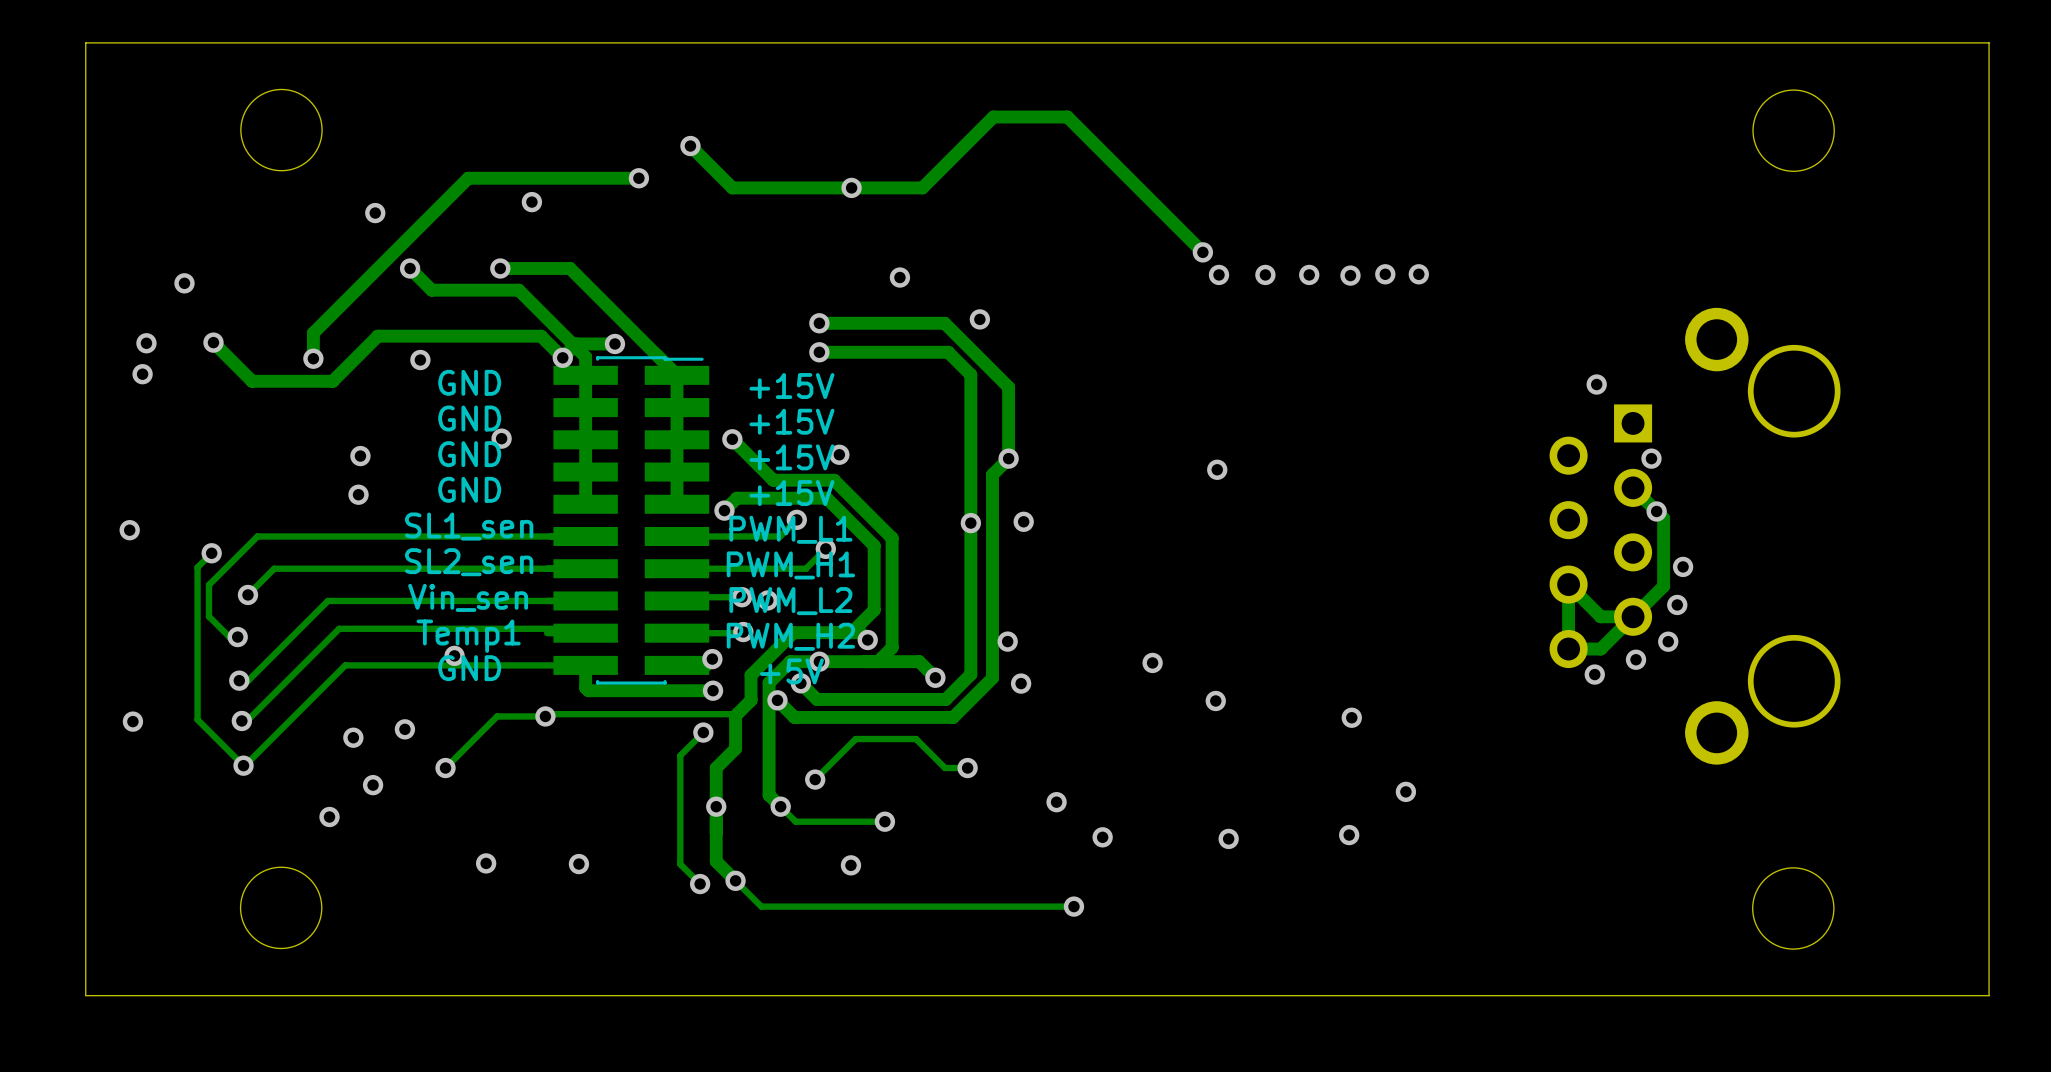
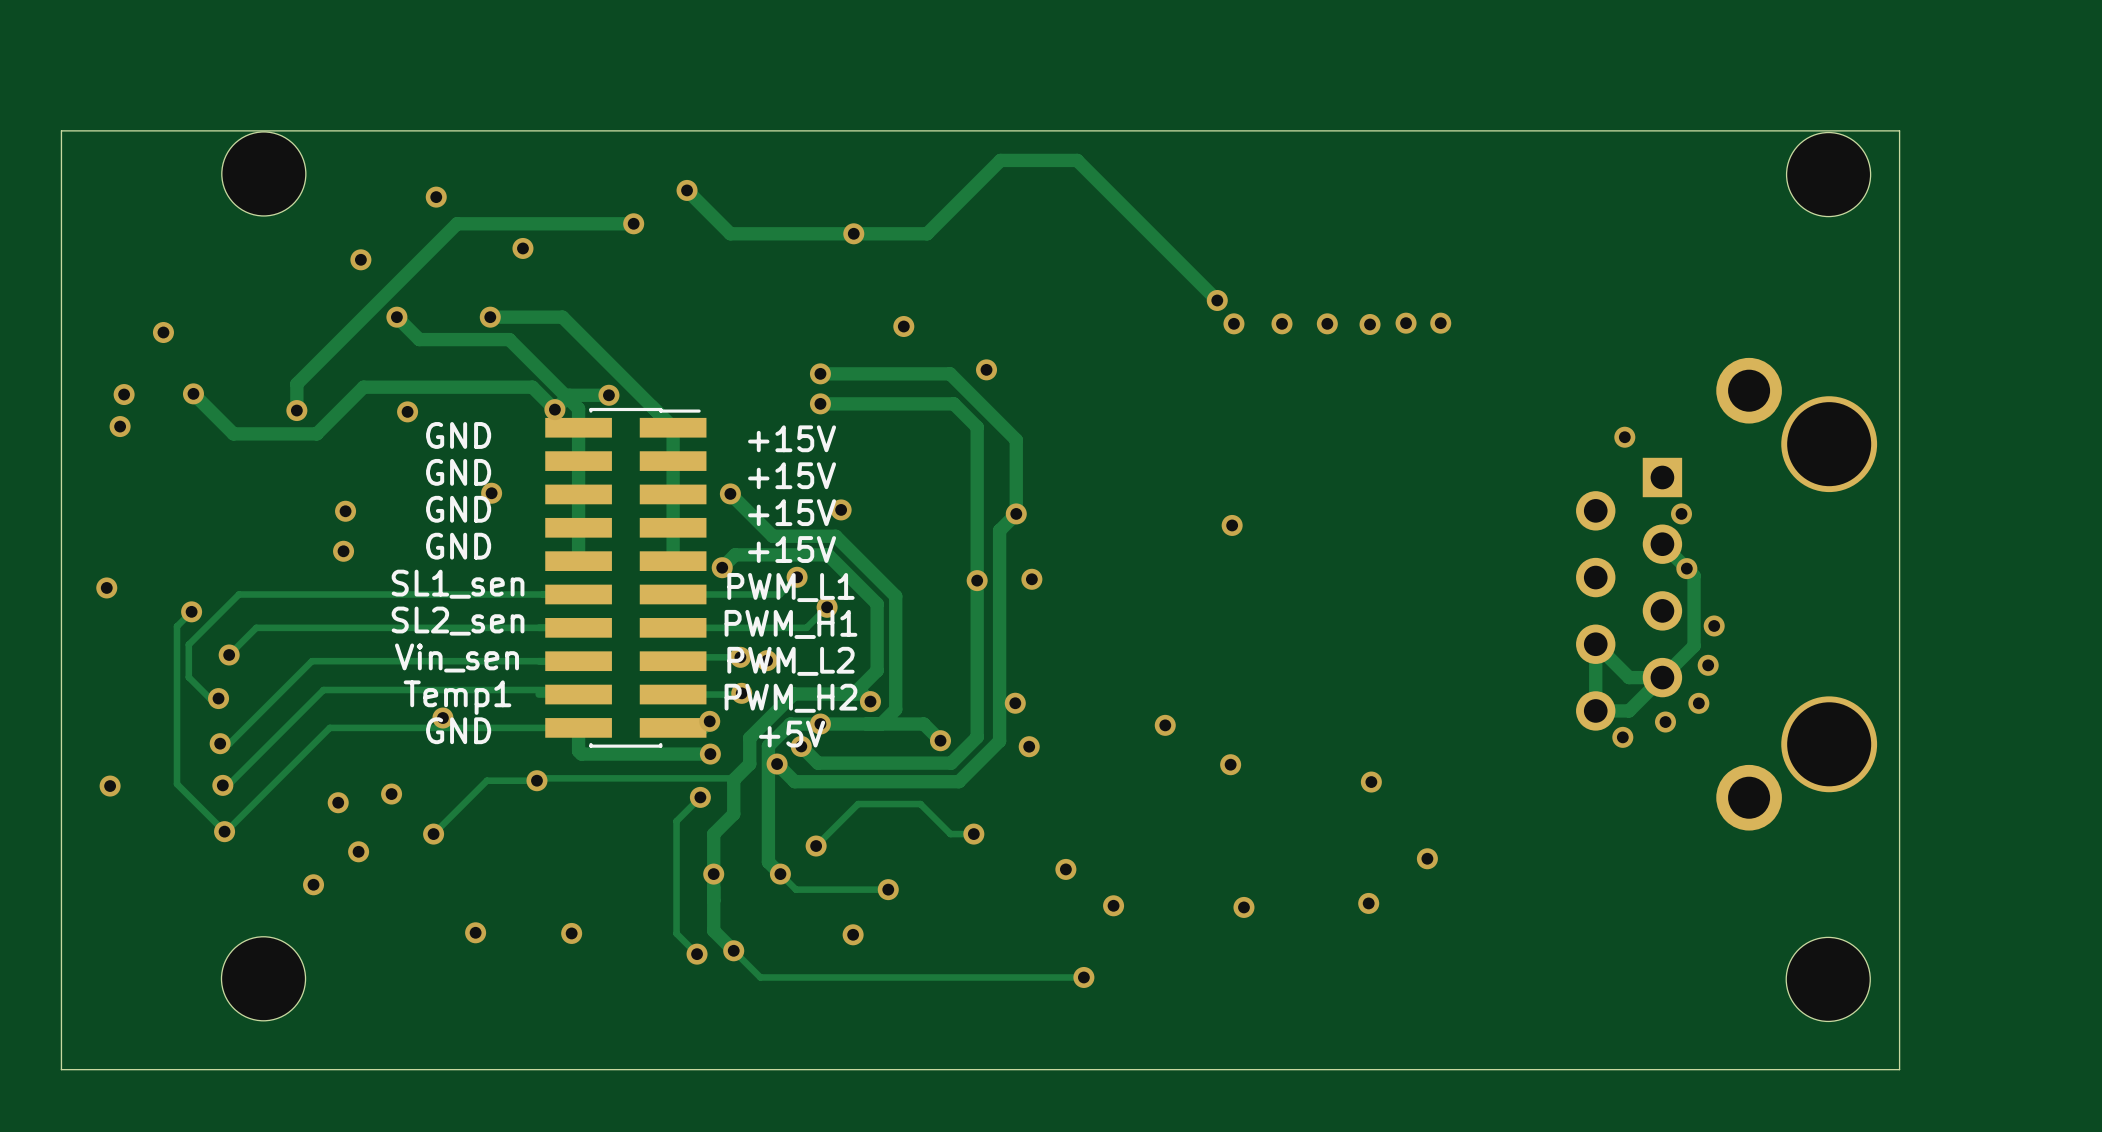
via: none -> (436, 197)
board edge: (1862, 995) (1989, 995) (1989, 42) (85, 42) (85, 995) -> (1899, 1069) (1899, 130) (61, 130) (61, 1069)

